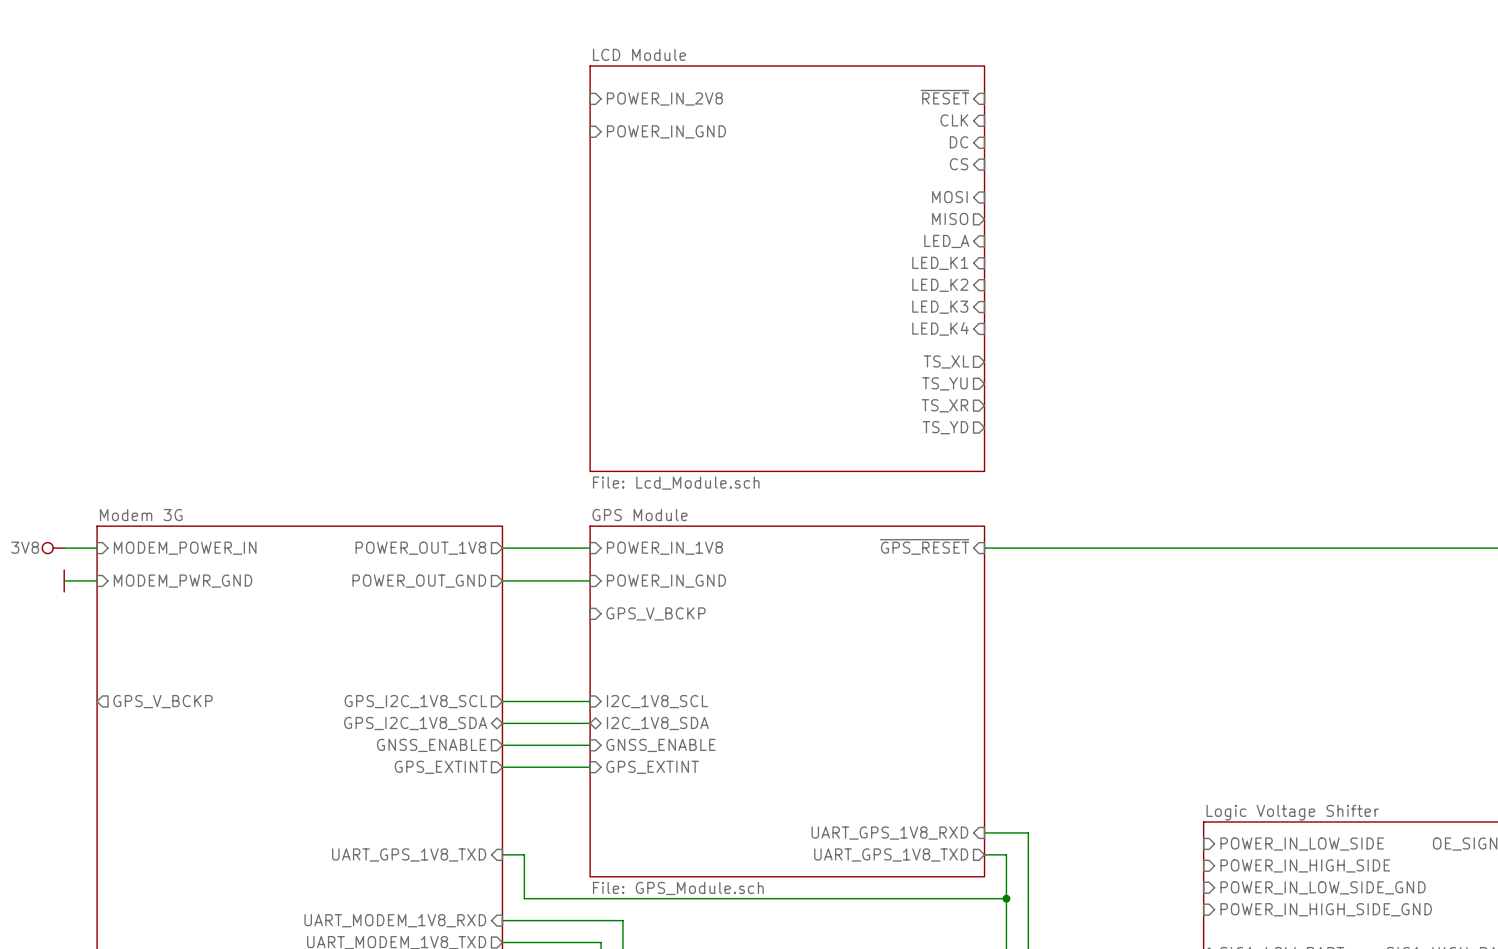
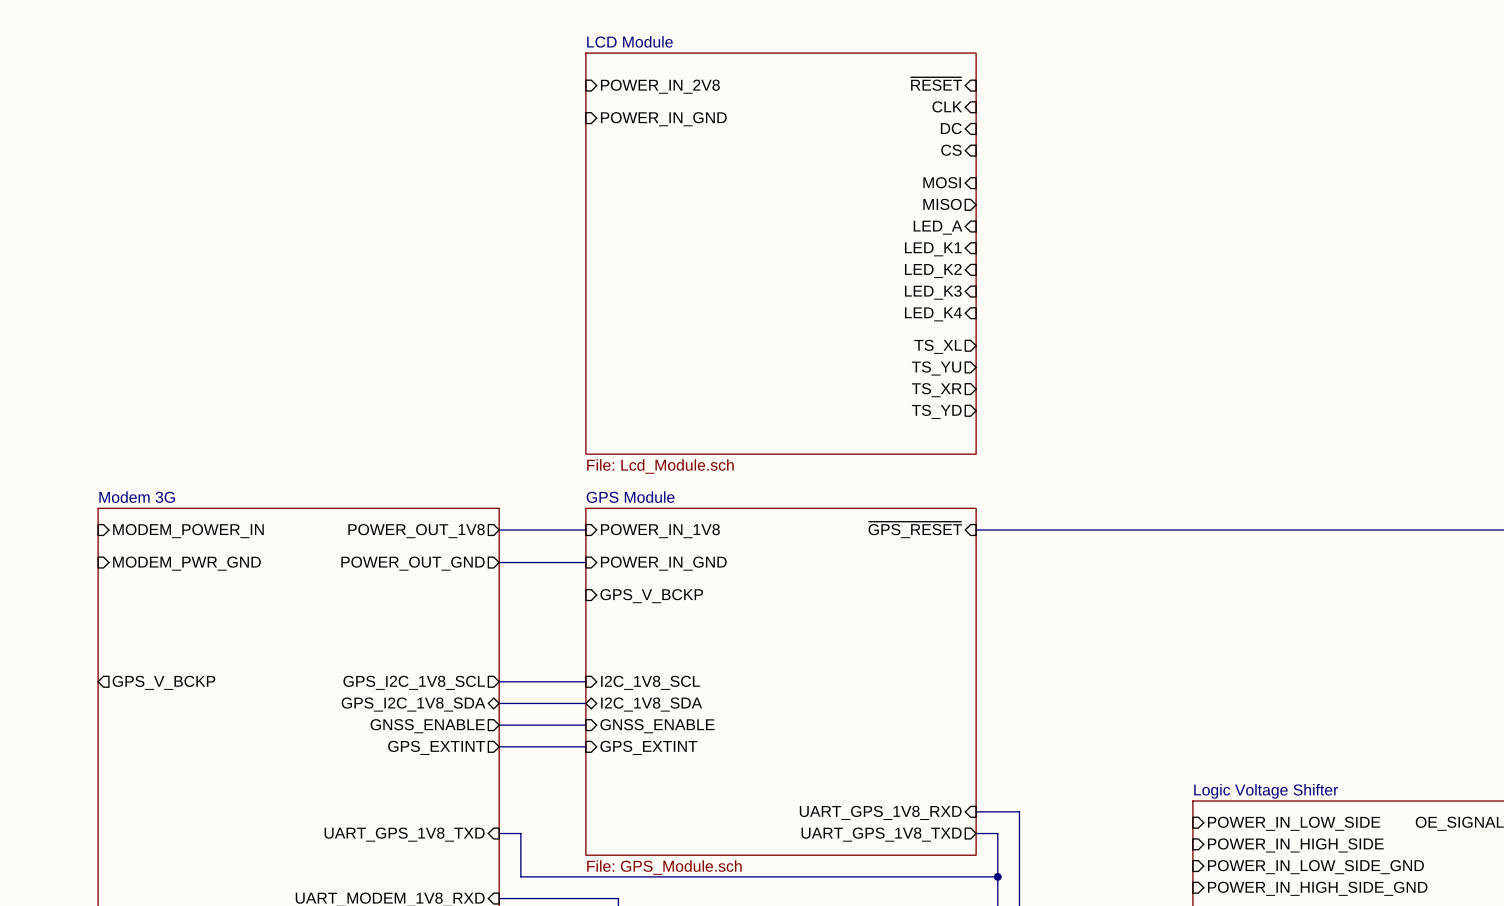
power symbol: 3V8 (53, 548) -> none
wire: (64, 548) (97, 548) -> none
wire: (64, 580) (97, 580) -> none
power symbol: (64, 580) -> none

